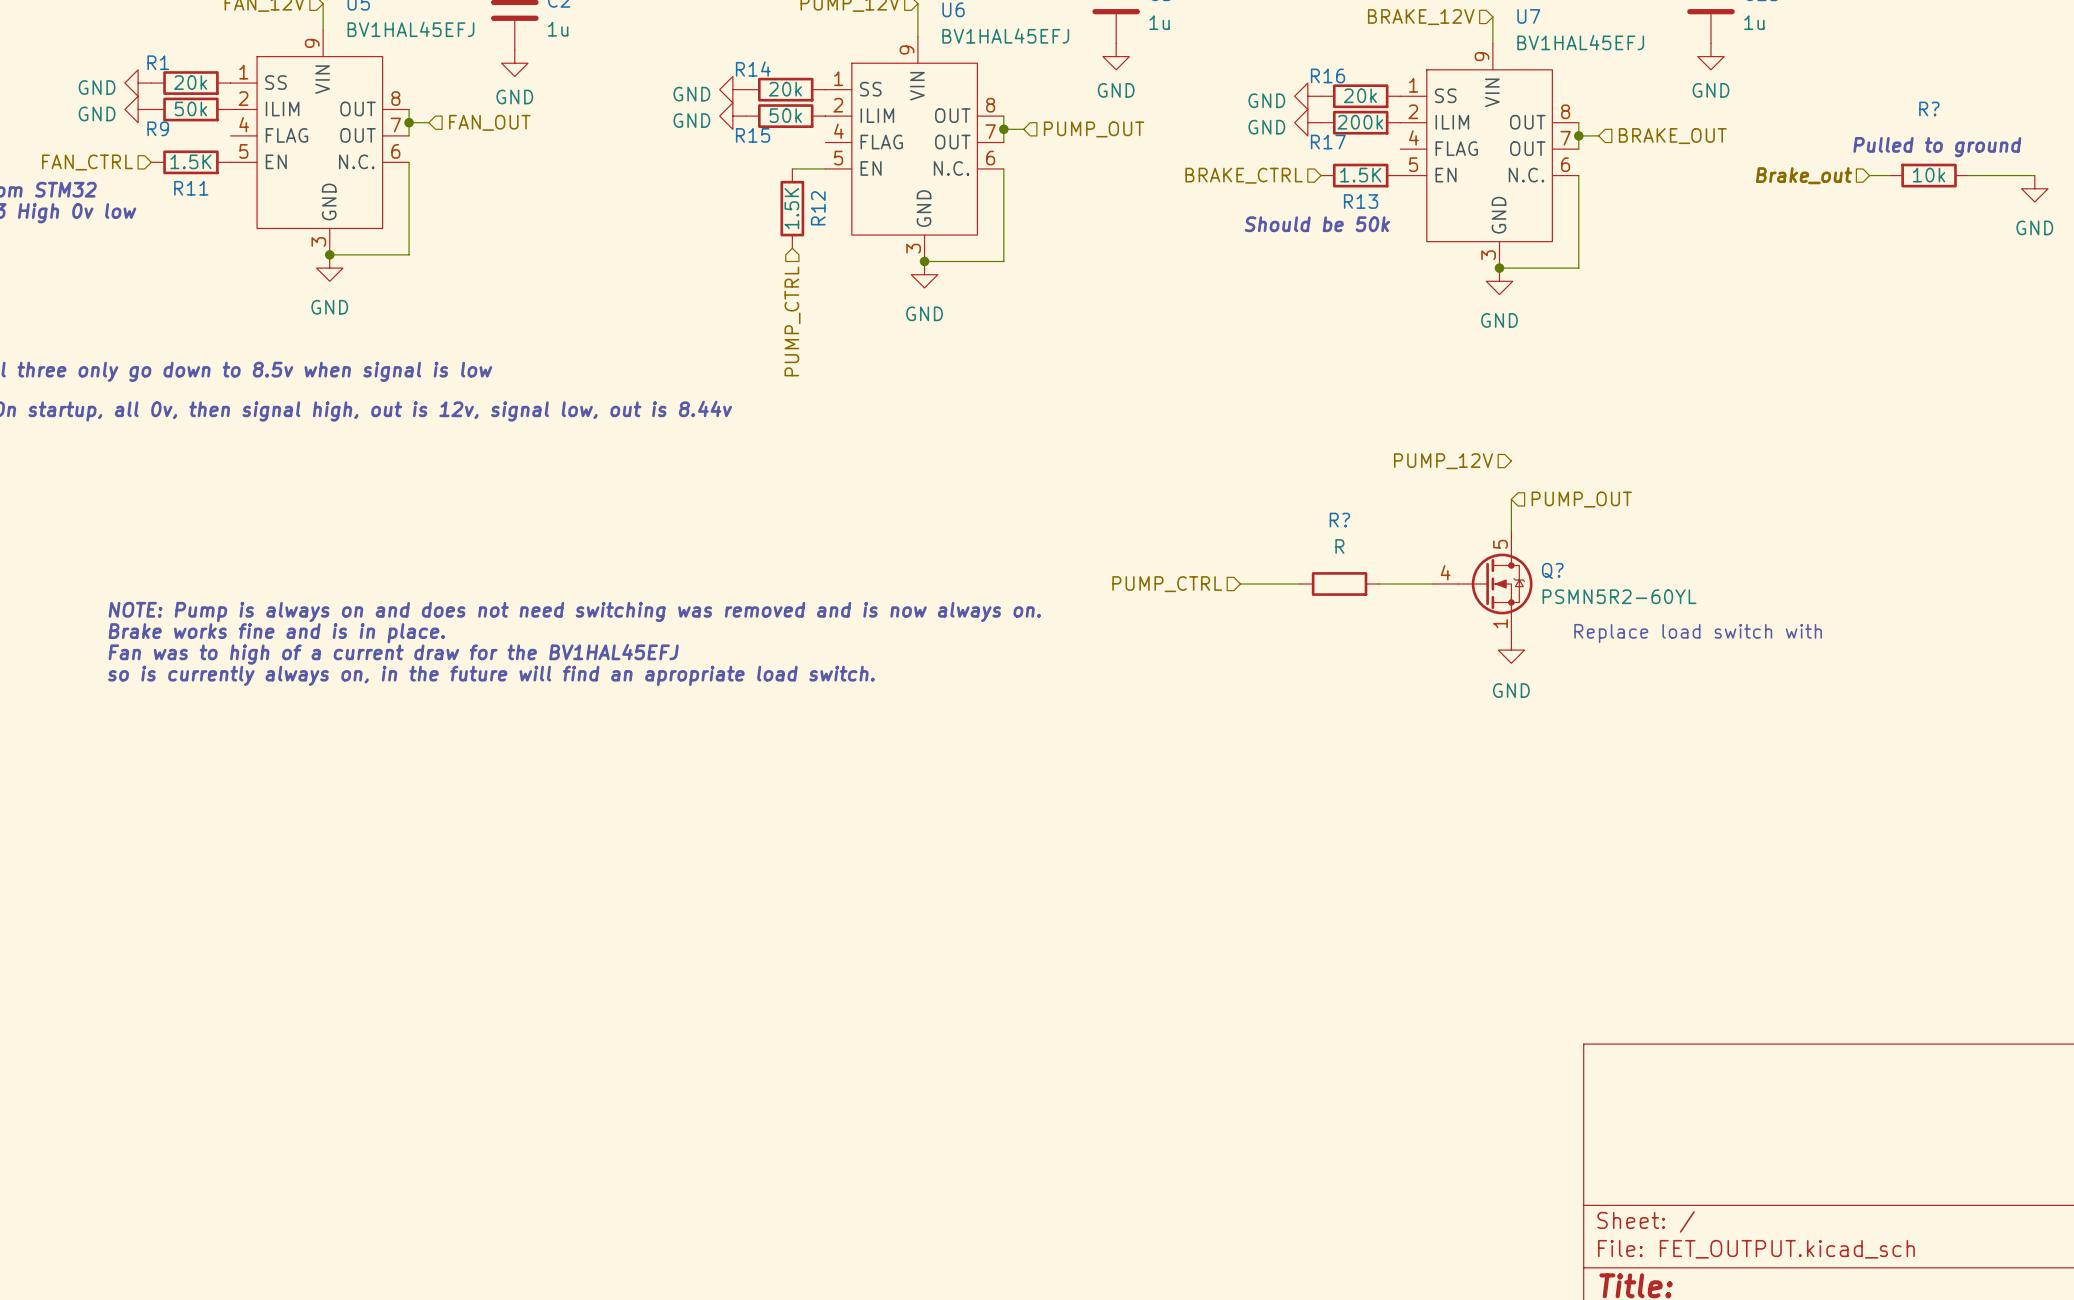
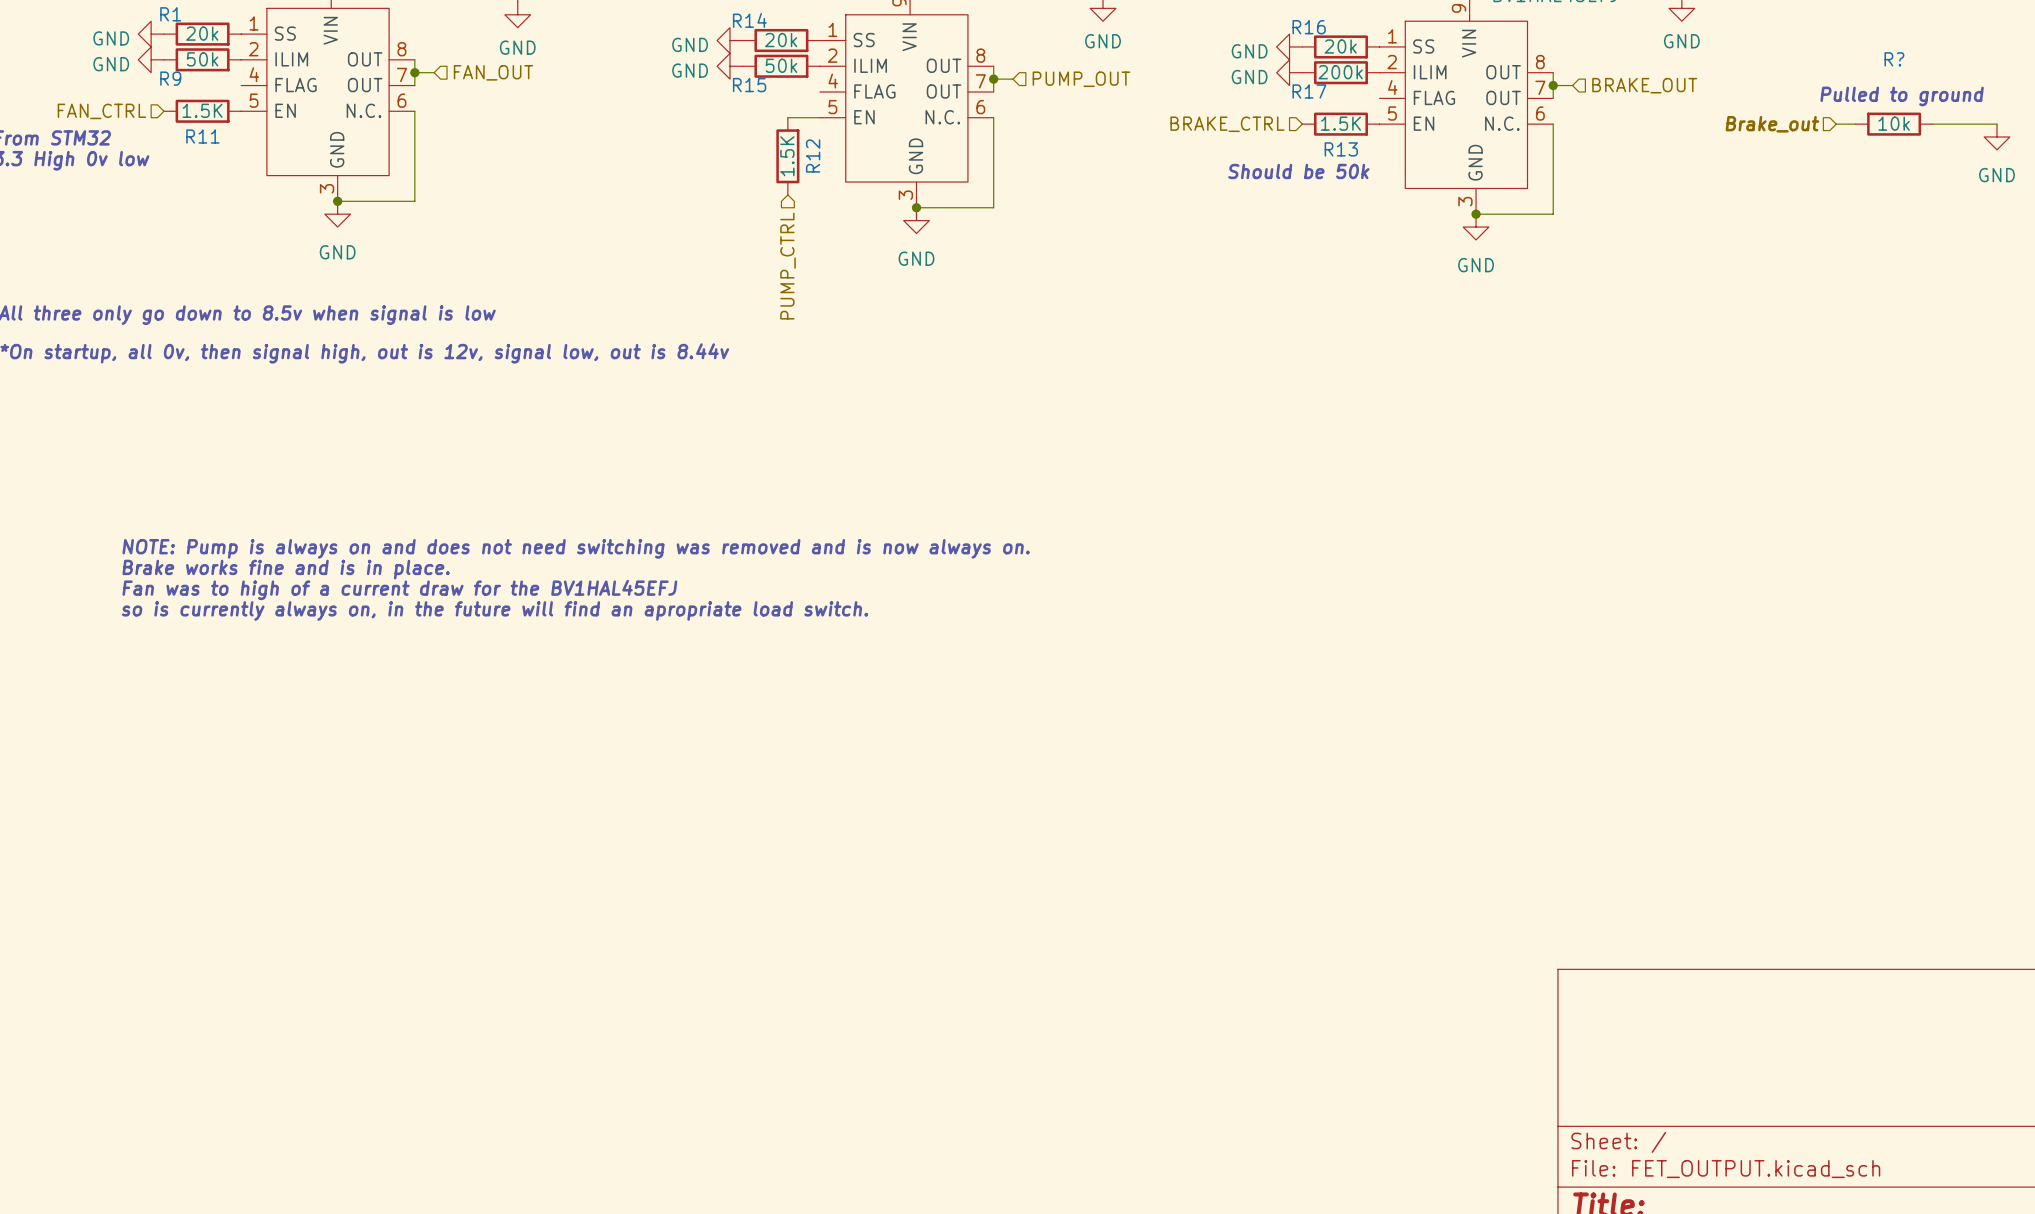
hierarchical label: PUMP_12V (1443, 461) -> none
wire: (1511, 499) (1511, 531) -> none
hierarchical label: PUMP_OUT (1581, 499) -> none
wire: (1240, 583) (1299, 583) -> none
R?: R (1339, 583) -> none
wire: (1379, 583) (1432, 583) -> none
Q?: PSMN5R2-60YL (1482, 583) -> none
hierarchical label: PUMP_CTRL (1167, 584) -> none
text: Replace load switch with (1698, 633) -> none
power symbol: GND (1511, 650) -> none

